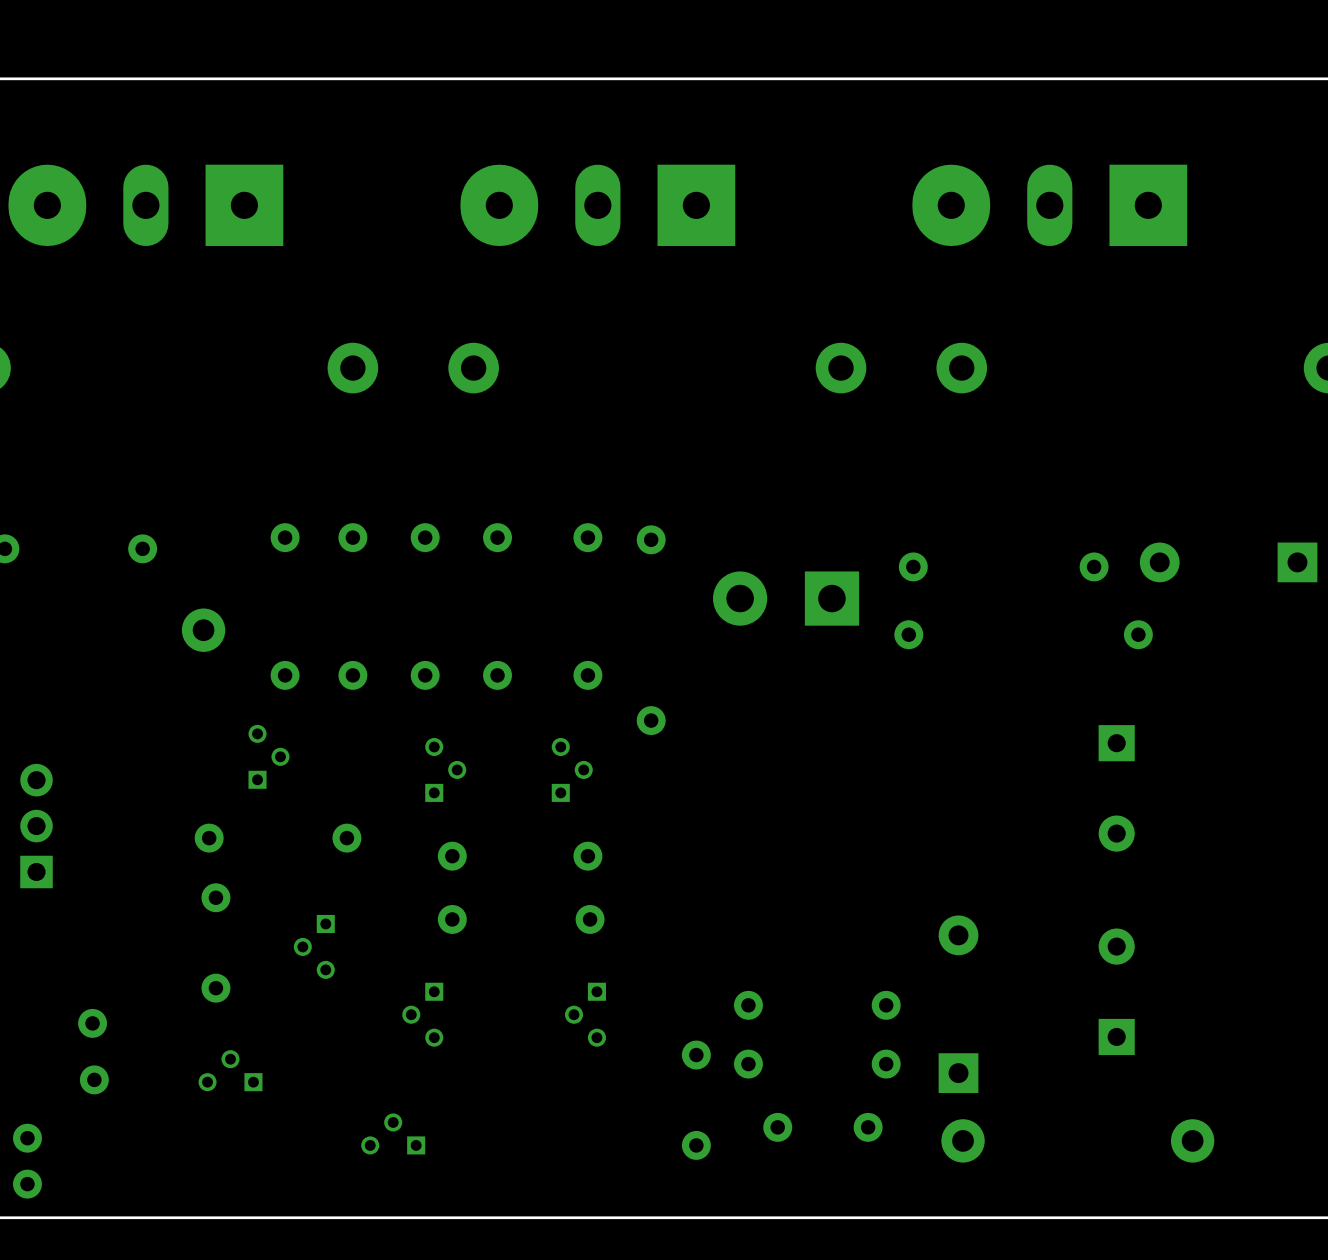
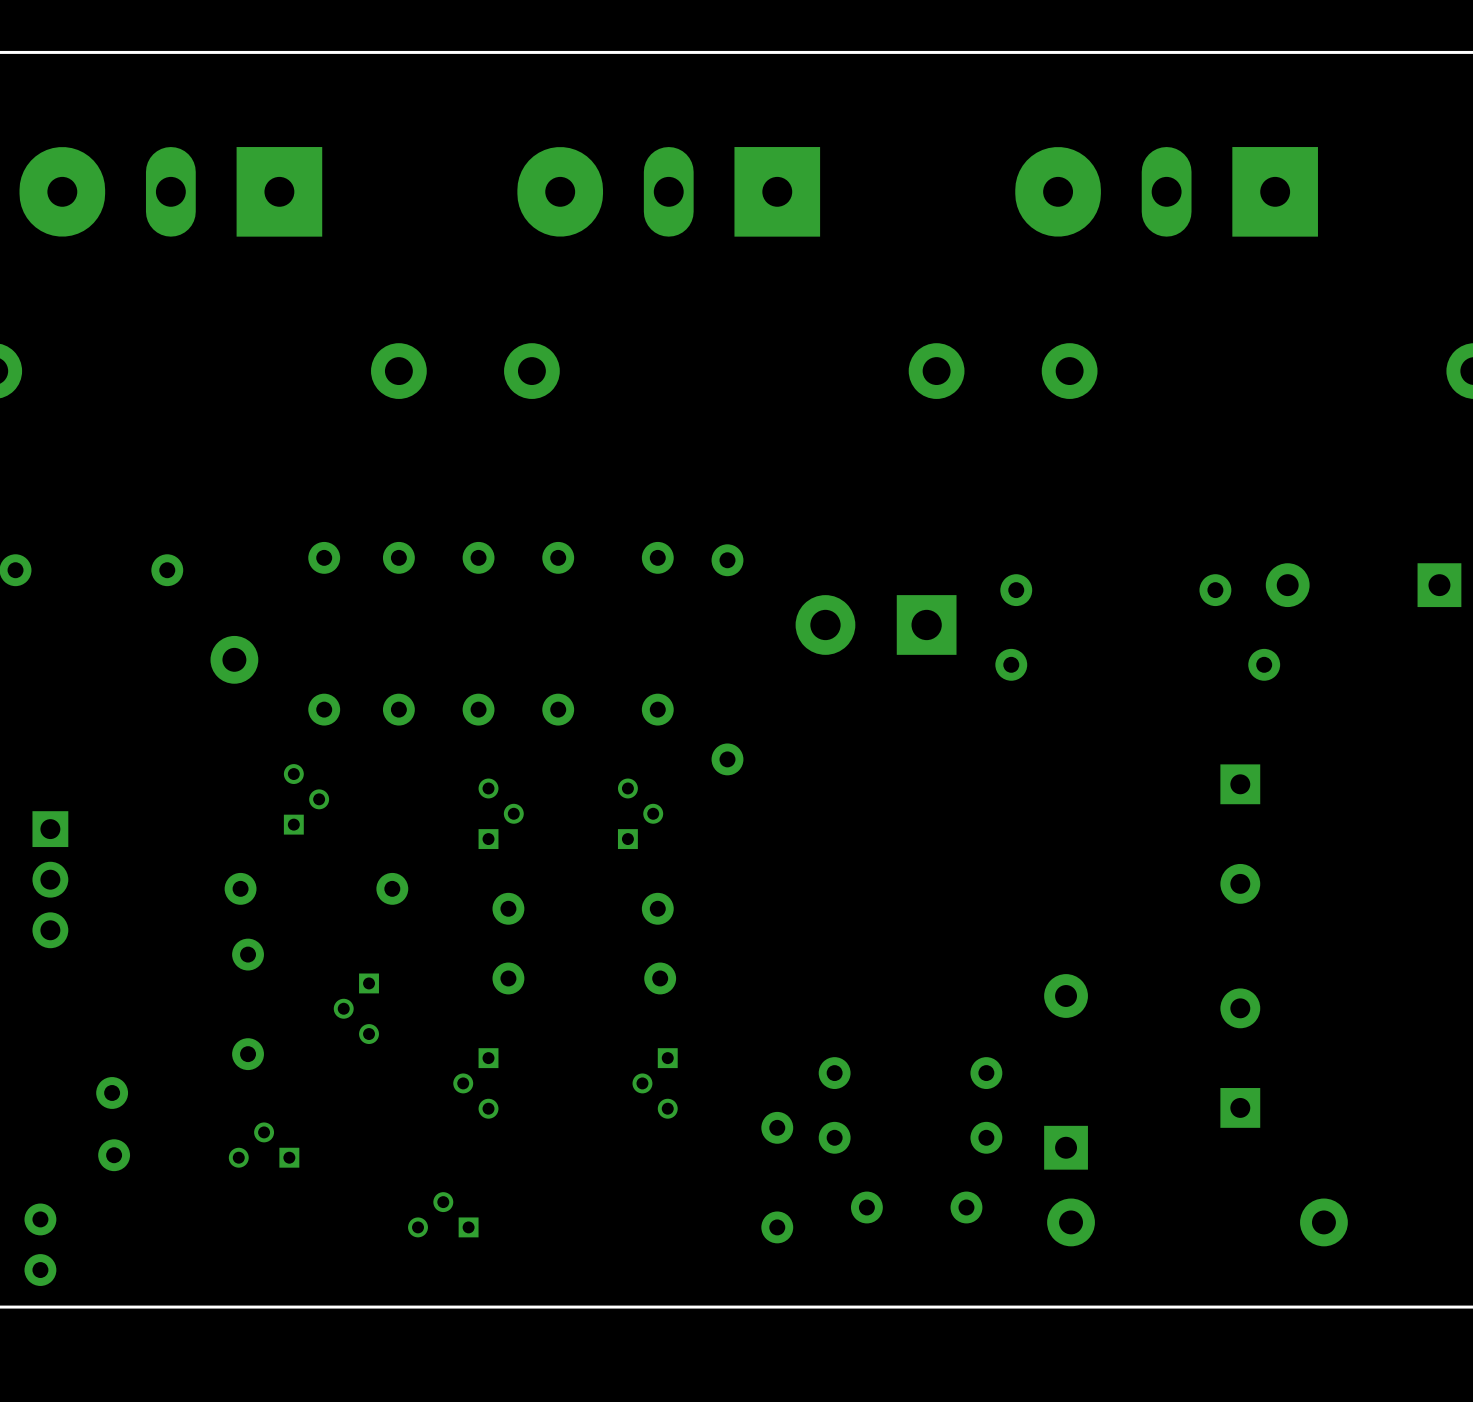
part rotation: 0° (36, 826) -> 180° (50, 879)

